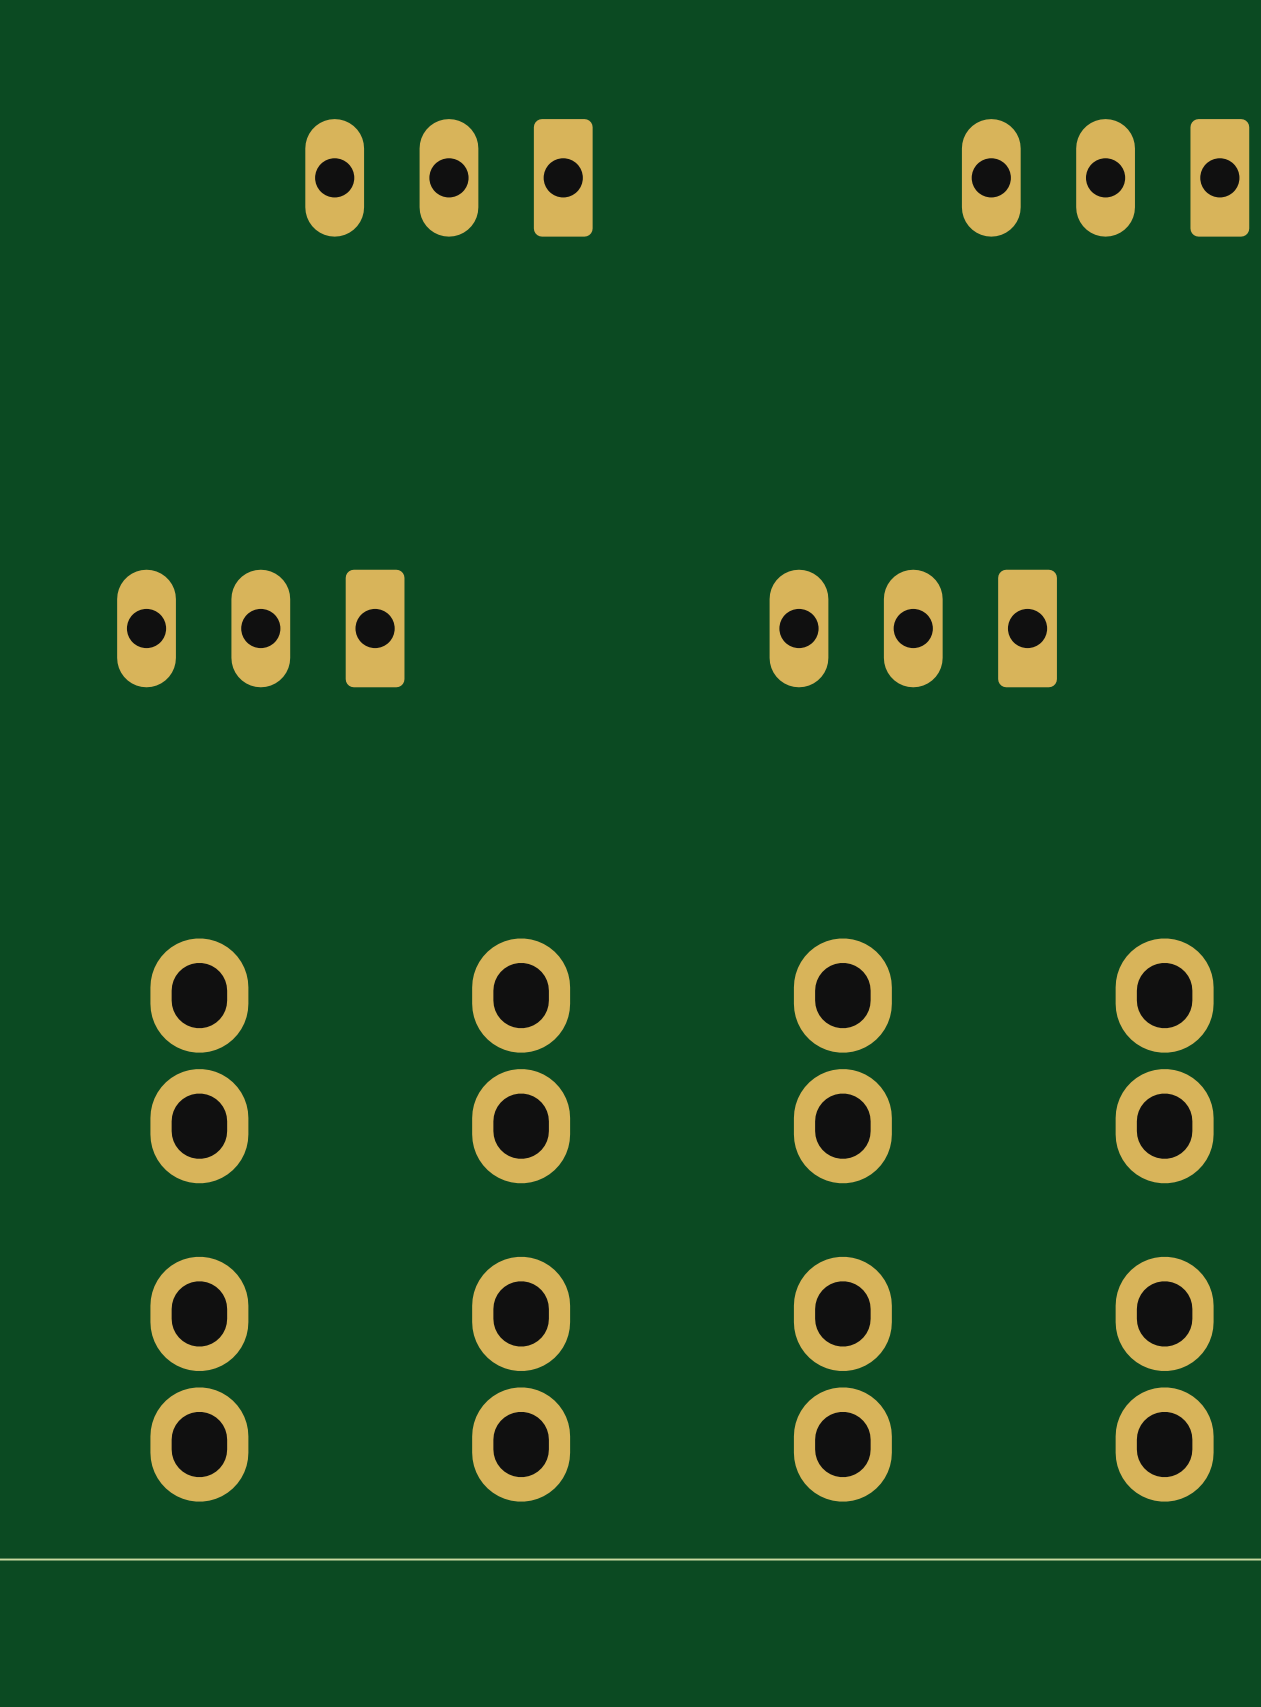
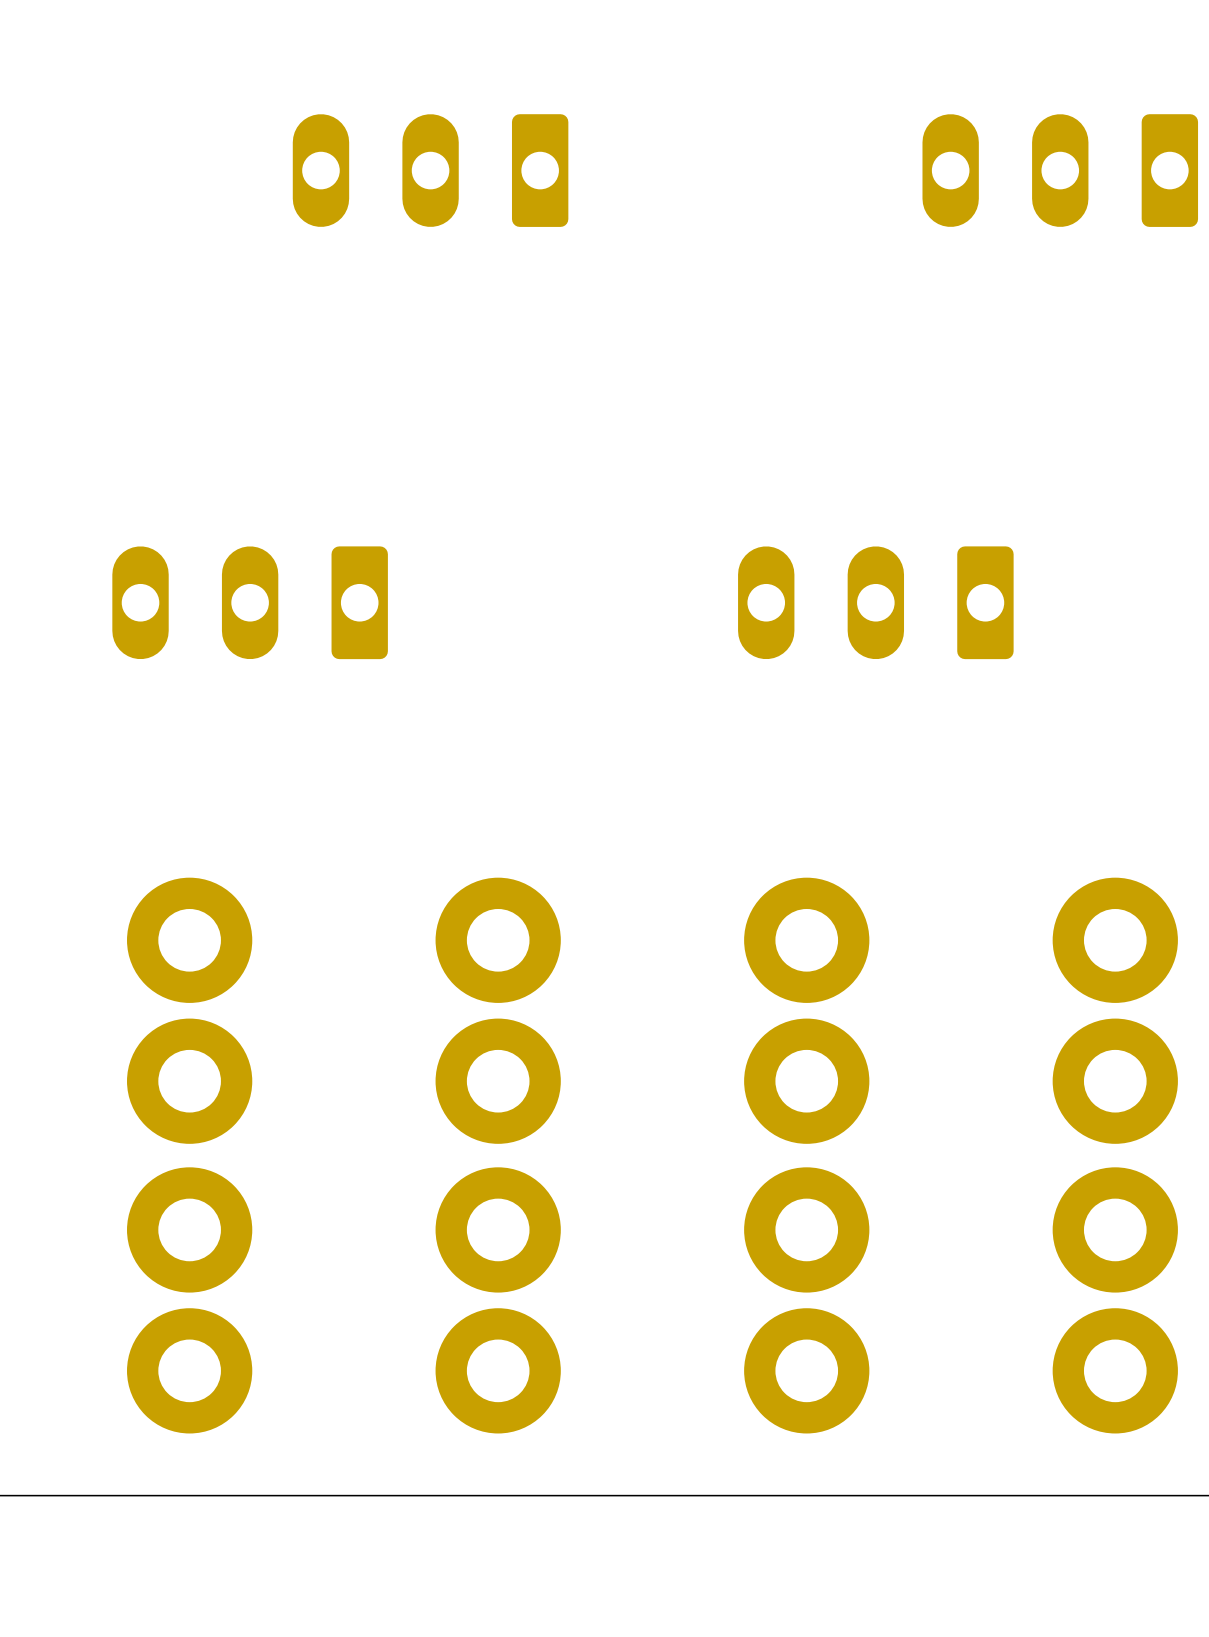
part footprint: [150, 938, 249, 1502] -> [127, 877, 253, 1434]
part footprint: [472, 938, 571, 1502] -> [435, 877, 561, 1434]
part footprint: [793, 938, 892, 1502] -> [744, 877, 870, 1434]
part footprint: [1115, 938, 1214, 1502] -> [1052, 877, 1178, 1434]

